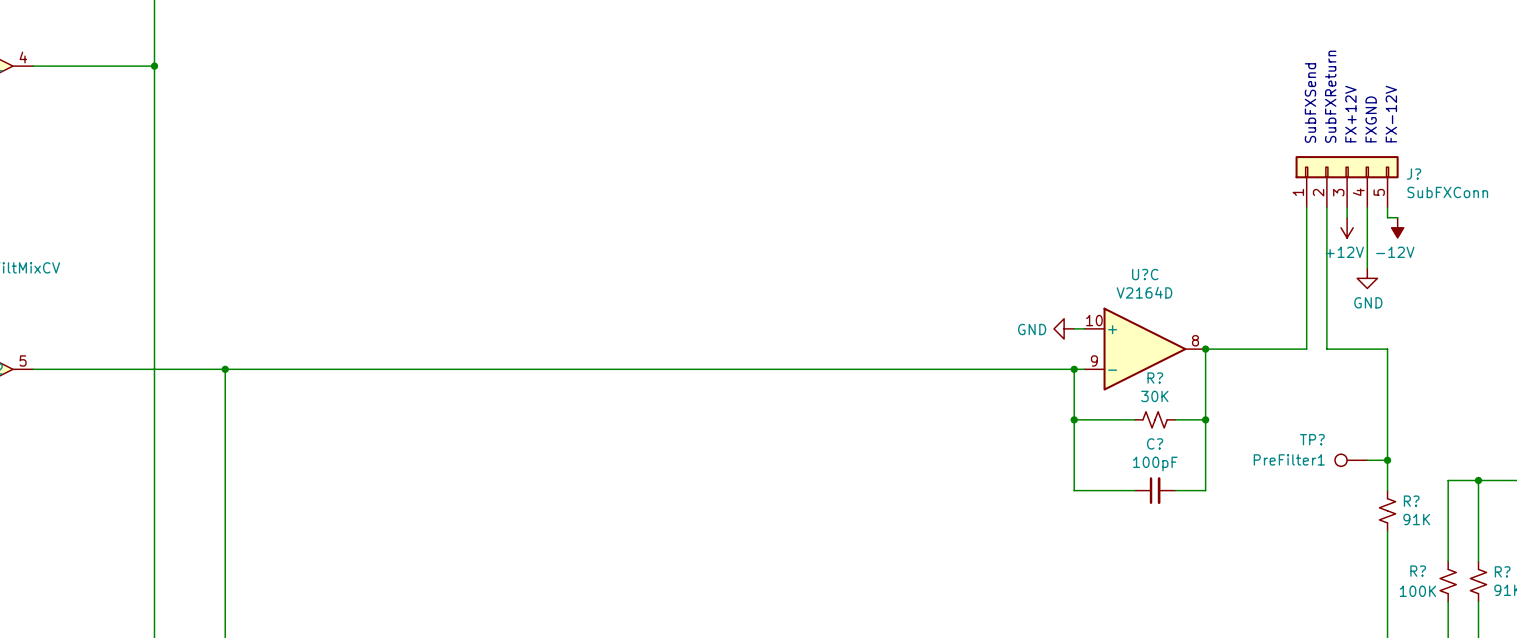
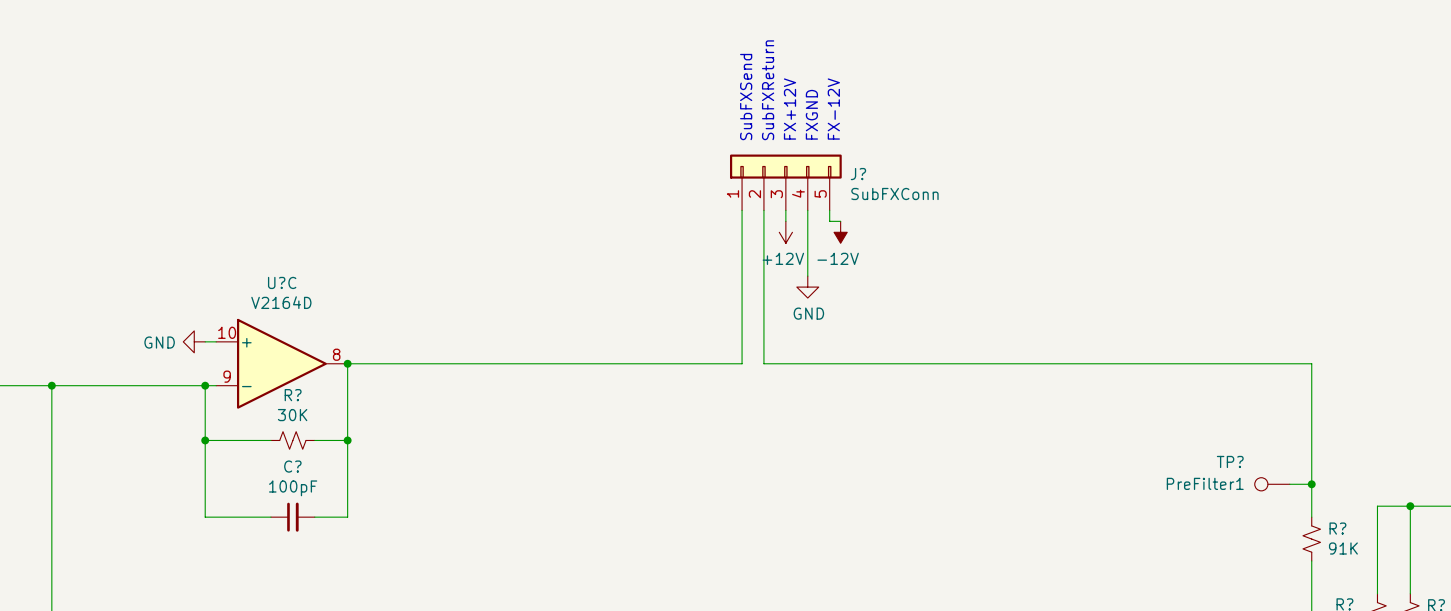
text: none -> SubFXReturn (768, 90)
text: SubFXReturn (1330, 96) -> none
text: none -> SubFXSend (746, 97)
text: SubFXSend (1310, 103) -> none
text: none -> FX+12V (790, 109)
text: none -> FX-12V (833, 109)
text: FX+12V (1350, 114) -> none
text: FX-12V (1391, 114) -> none
text: none -> FXGND (811, 114)
text: FXGND (1371, 119) -> none
J?: none -> SubFXConn (785, 182)
J?: SubFXConn (1347, 181) -> none
wire: none -> (742, 210) (742, 363) (347, 363) (347, 517) (314, 517)
wire: none -> (785, 210) (785, 221)
wire: none -> (807, 210) (807, 276)
wire: none -> (829, 210) (829, 221) (840, 221)
wire: (1306, 207) (1306, 349) -> (1246, 363) (1224, 363)
wire: (1326, 207) (1326, 349) -> none
wire: (1347, 207) (1347, 217) -> none
wire: (1367, 207) (1367, 268) -> none
wire: (1387, 207) (1387, 217) (1397, 217) -> none
power symbol: none -> +12V (785, 232)
power symbol: none -> -12V (840, 232)
power symbol: +12V (1347, 227) -> none
power symbol: -12V (1397, 227) -> none
power symbol: GND (1367, 278) -> none
power symbol: none -> GND (194, 341)
wire: none -> (205, 341) (216, 341)
power symbol rotation: 0° (1064, 328) -> 90° counterclockwise (807, 287)
power symbol position: GND (1064, 328) -> GND (807, 287)
wire: (1074, 328) (1084, 328) -> none
U?C: none -> V2164D (281, 363)
junction: none -> (347, 363)
U?C: V2164D (1144, 349) -> none
wire: (1205, 349) (1205, 490) (1175, 490) -> (1114, 363) (763, 363) (763, 210)
junction: (1205, 349) -> none
wire: none -> (205, 385) (205, 517) (270, 517)
junction: none -> (205, 385)
wire: (376, 369) (1084, 369) -> none
wire: (1074, 369) (1074, 490) (1134, 490) -> none
junction: (1074, 369) -> none
wire: none -> (205, 440) (270, 440)
junction: none -> (205, 440)
R?: none -> 30K (292, 440)
wire: none -> (314, 440) (347, 440)
junction: none -> (347, 440)
wire: (1074, 419) (1134, 419) -> none
junction: (1074, 419) -> none
R?: 30K (1155, 419) -> none
wire: (1175, 419) (1205, 419) -> none
junction: (1205, 419) -> none
C?: none -> 100pF (292, 517)
C?: 100pF (1155, 490) -> none

